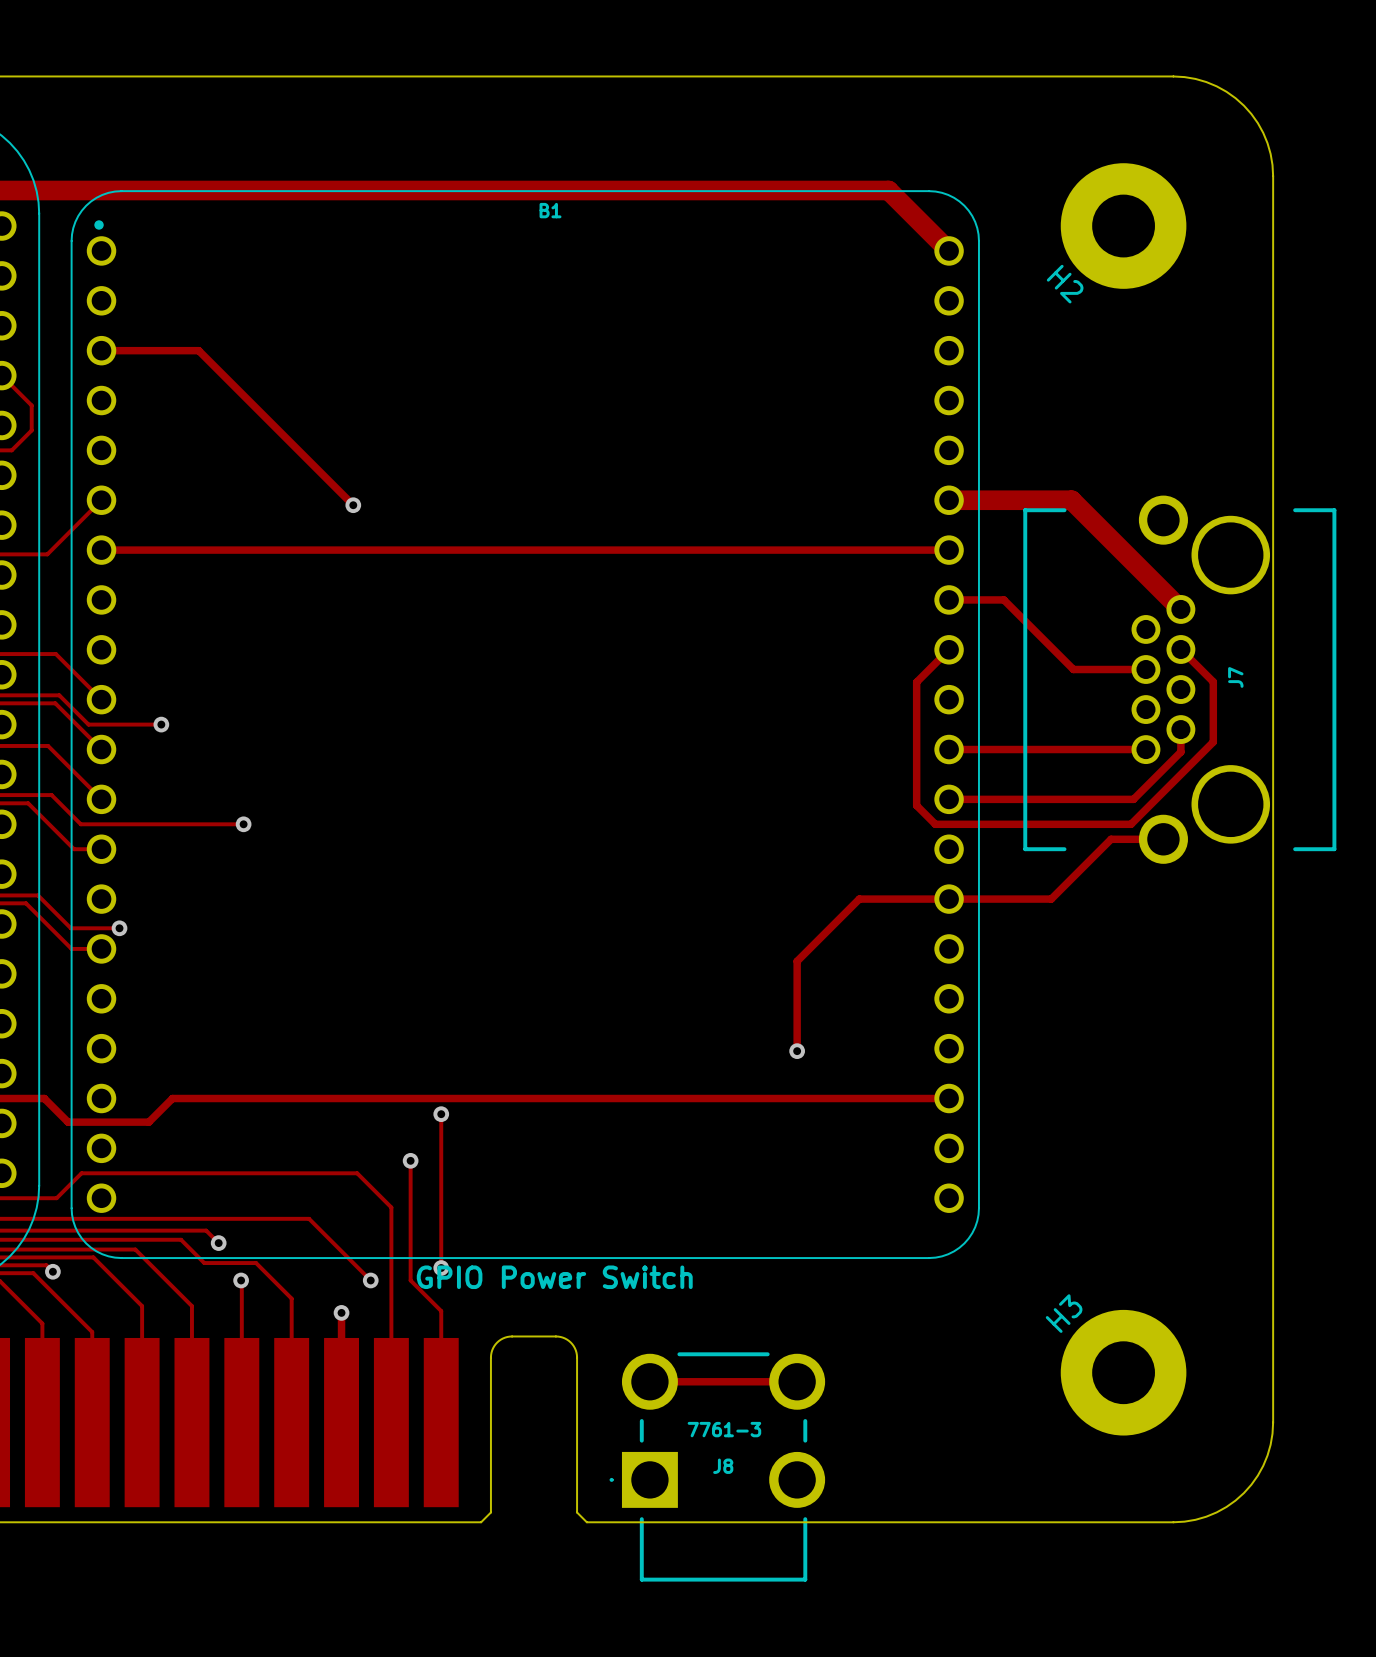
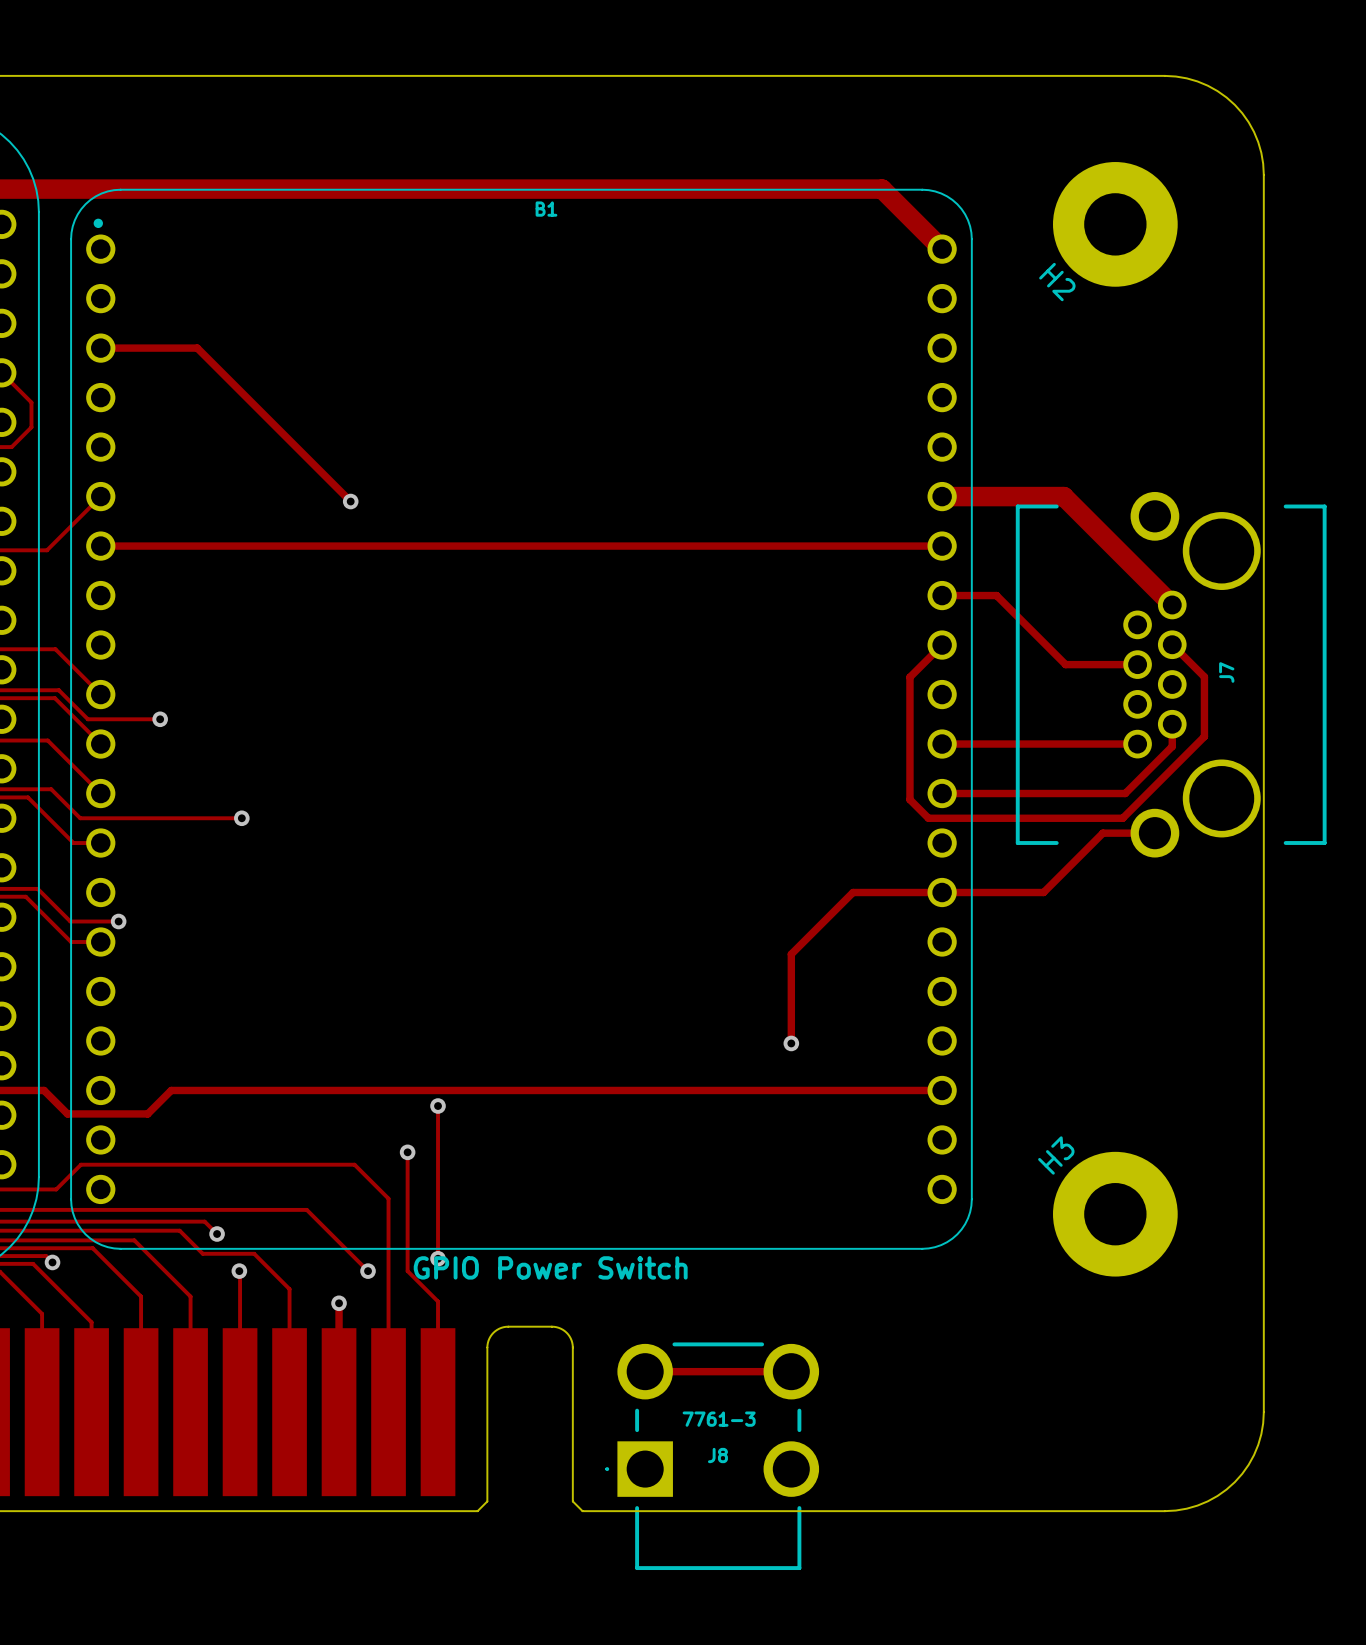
H3 position: (1123, 1372) -> (1115, 1214)

